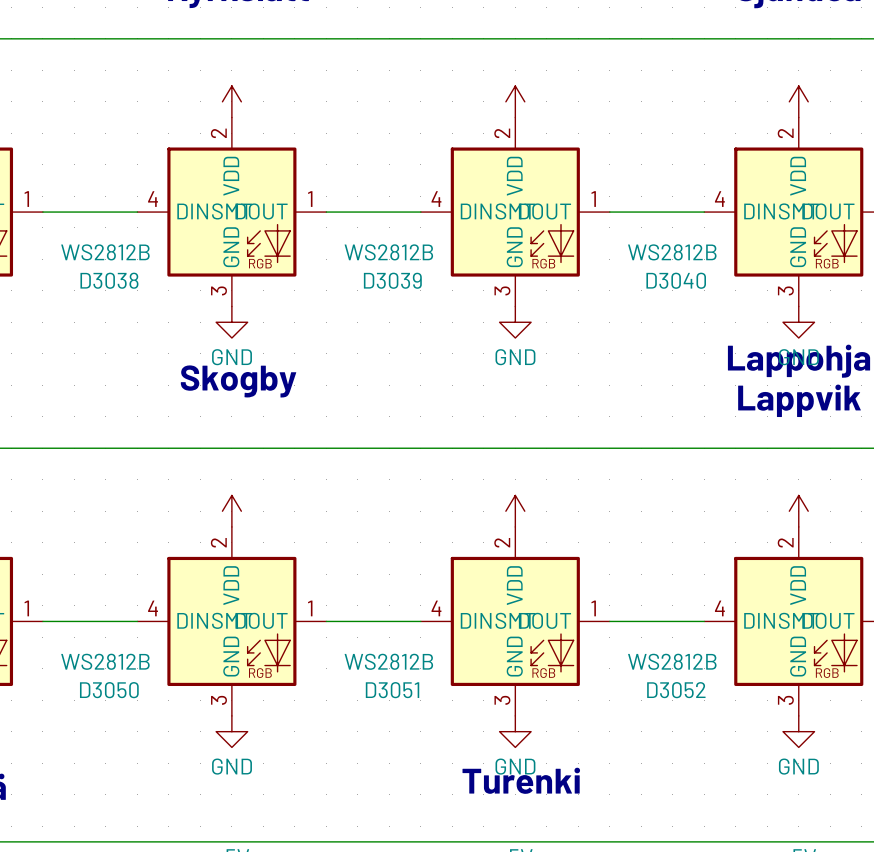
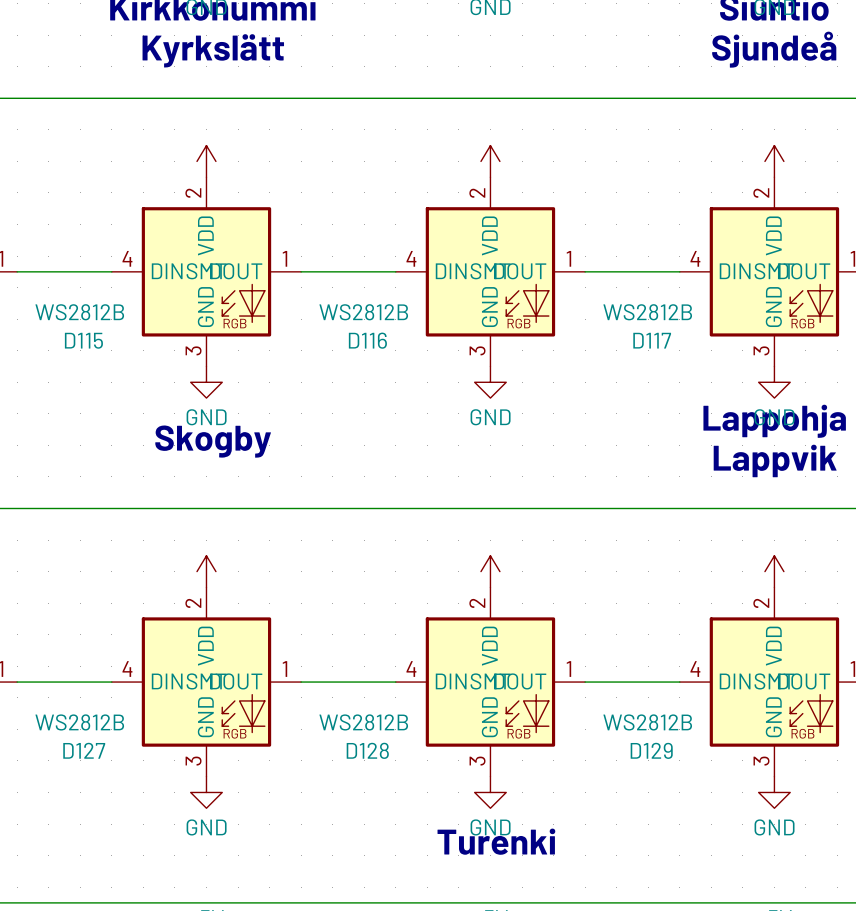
D3038 name: D3038 (109, 280) -> D115 (83, 340)
D3039 name: D3039 (392, 280) -> D116 (367, 340)
D3040 name: D3040 (676, 280) -> D117 (652, 340)
D3050 name: D3050 (109, 690) -> D127 (84, 750)
D3051 name: D3051 (392, 690) -> D128 (367, 750)
D3052 name: D3052 (676, 690) -> D129 (651, 750)

